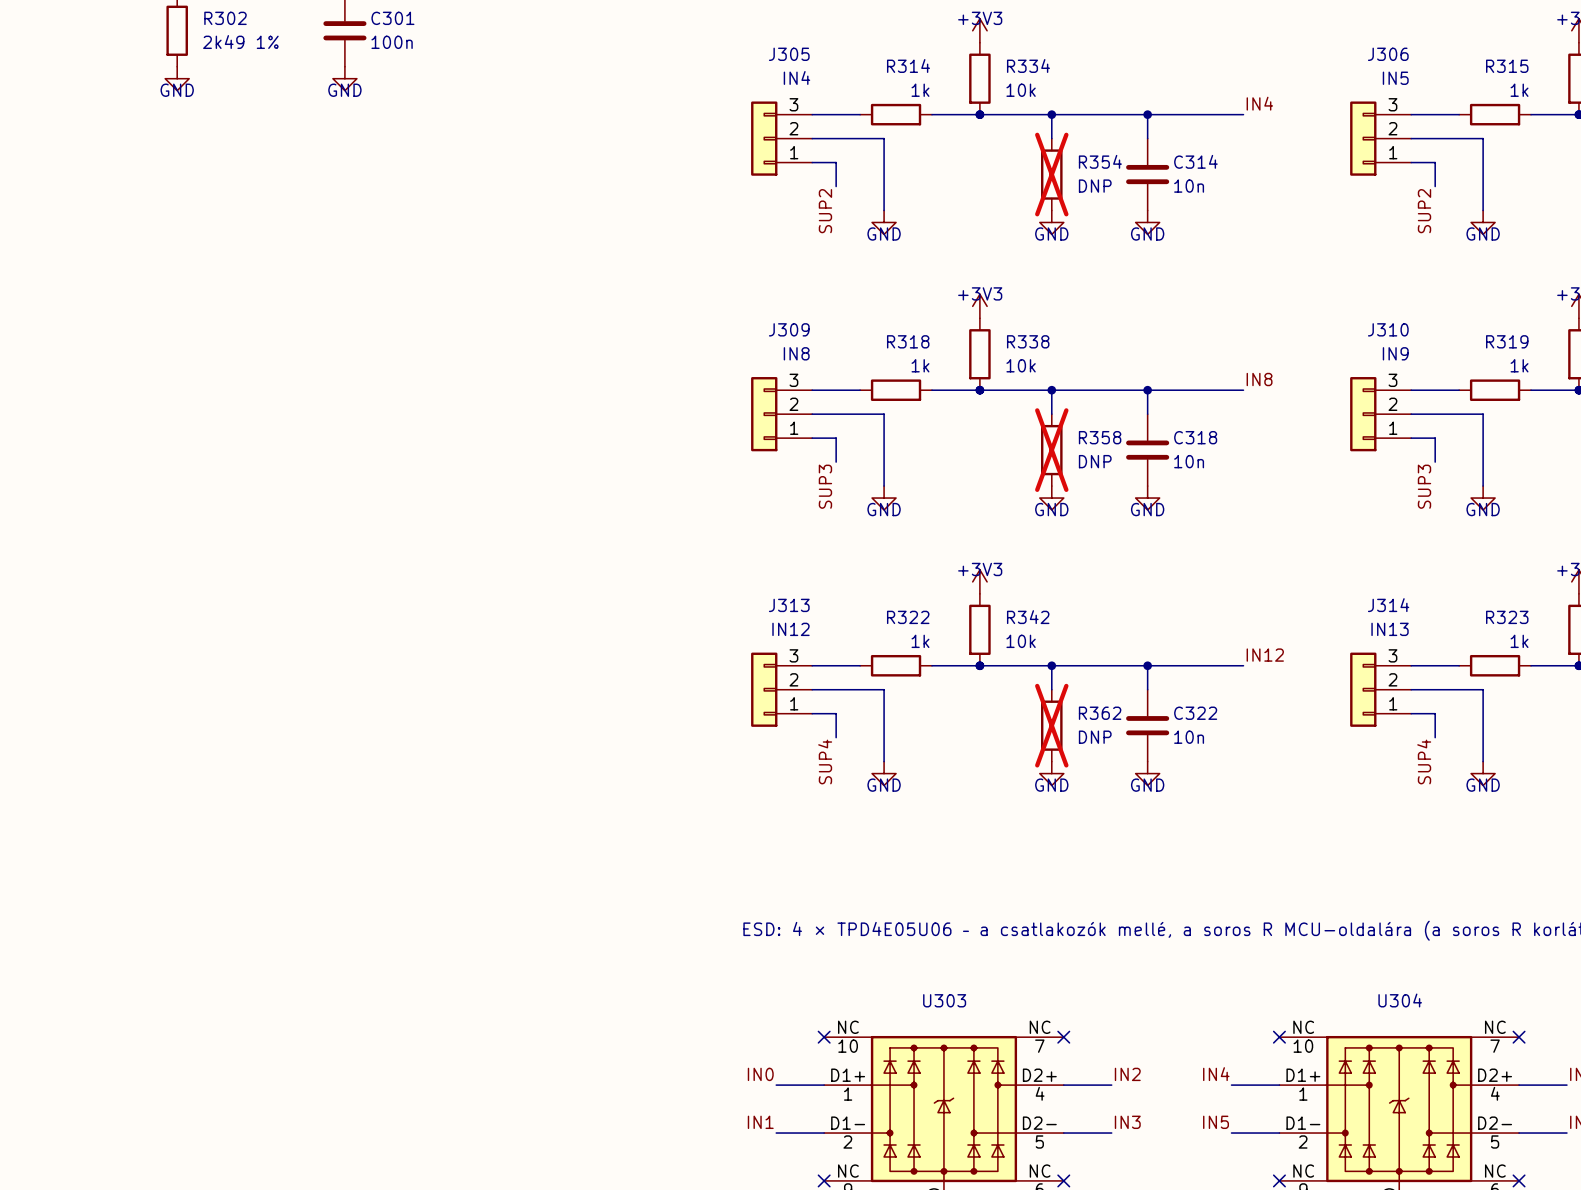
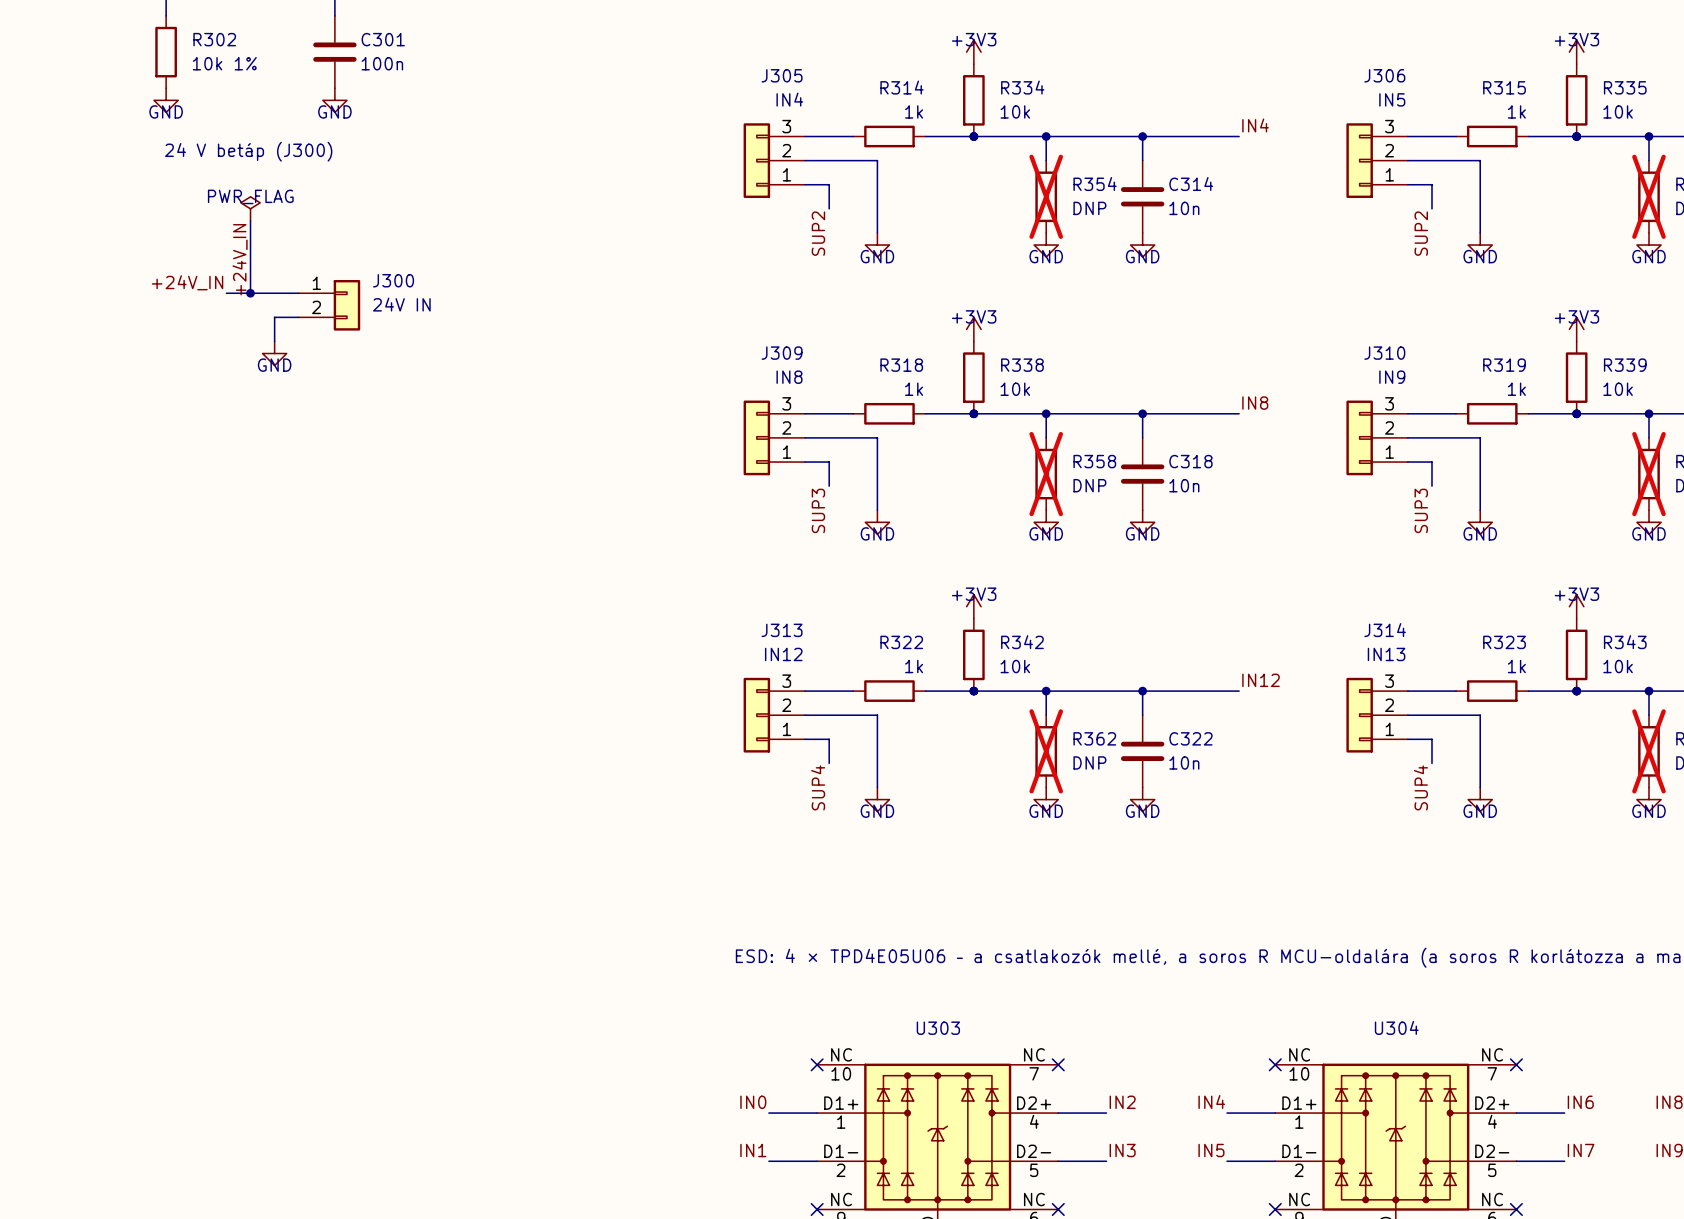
R302 value: 2k49 1% (240, 42) -> 10k 1% (224, 63)
text: none -> 24 V betáp (J300) (248, 151)
power symbol: none -> PWR_FLAG (250, 208)
wire: none -> (250, 220) (250, 293)
label: none -> +24V_IN (240, 259)
label: none -> +24V_IN (187, 282)
wire: none -> (226, 293) (298, 293)
junction: none -> (250, 293)
J300: none -> 24V IN (329, 305)
wire: none -> (298, 317) (274, 317) (274, 341)
power symbol: none -> GND (274, 353)

